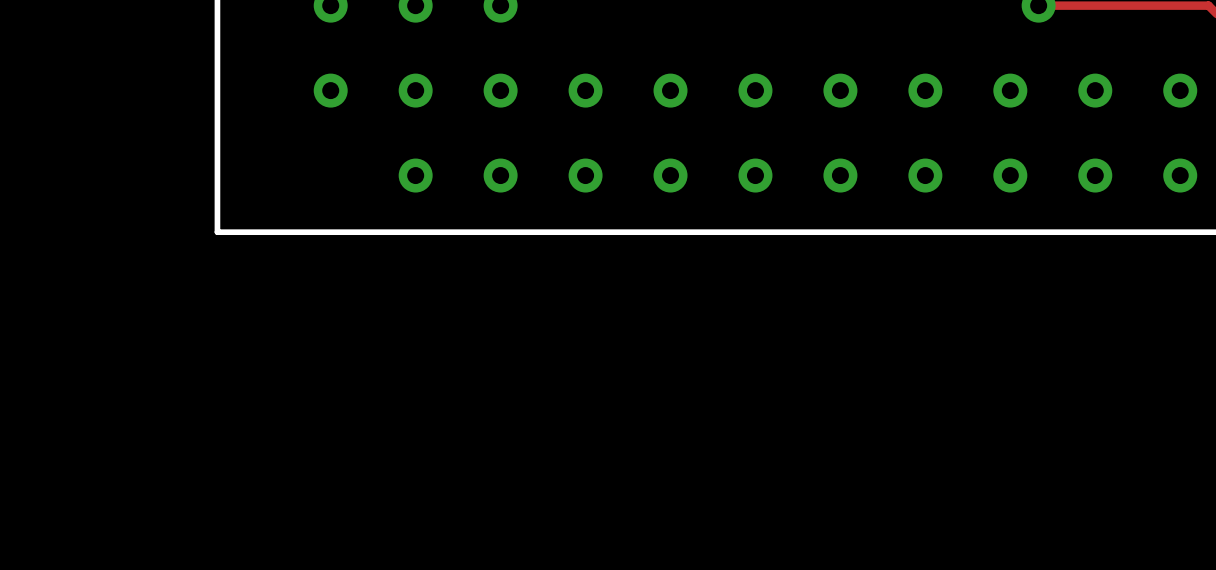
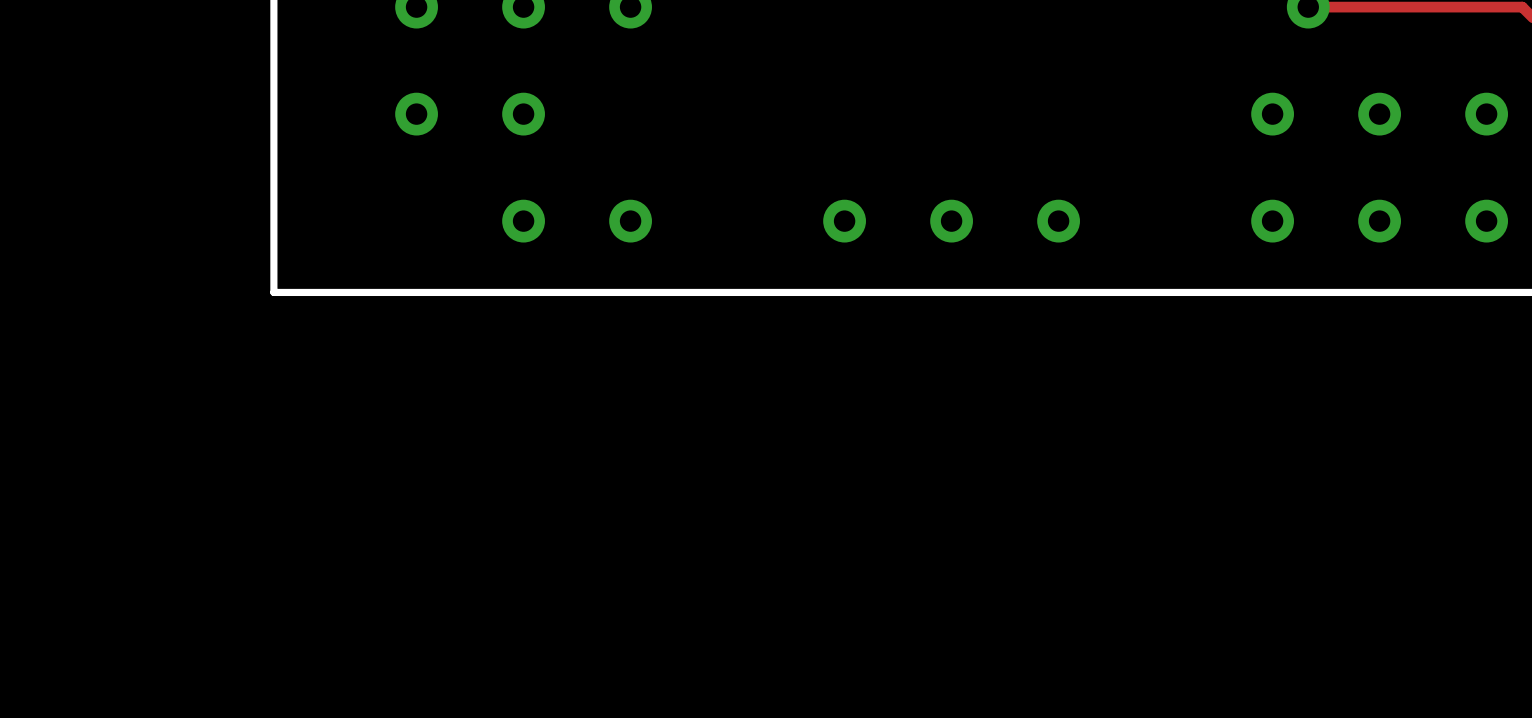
via: (500, 90) -> none
via: (585, 90) -> none
via: (670, 90) -> none
via: (755, 90) -> none
via: (840, 90) -> none
via: (925, 90) -> none
via: (585, 175) -> none
via: (925, 175) -> none

